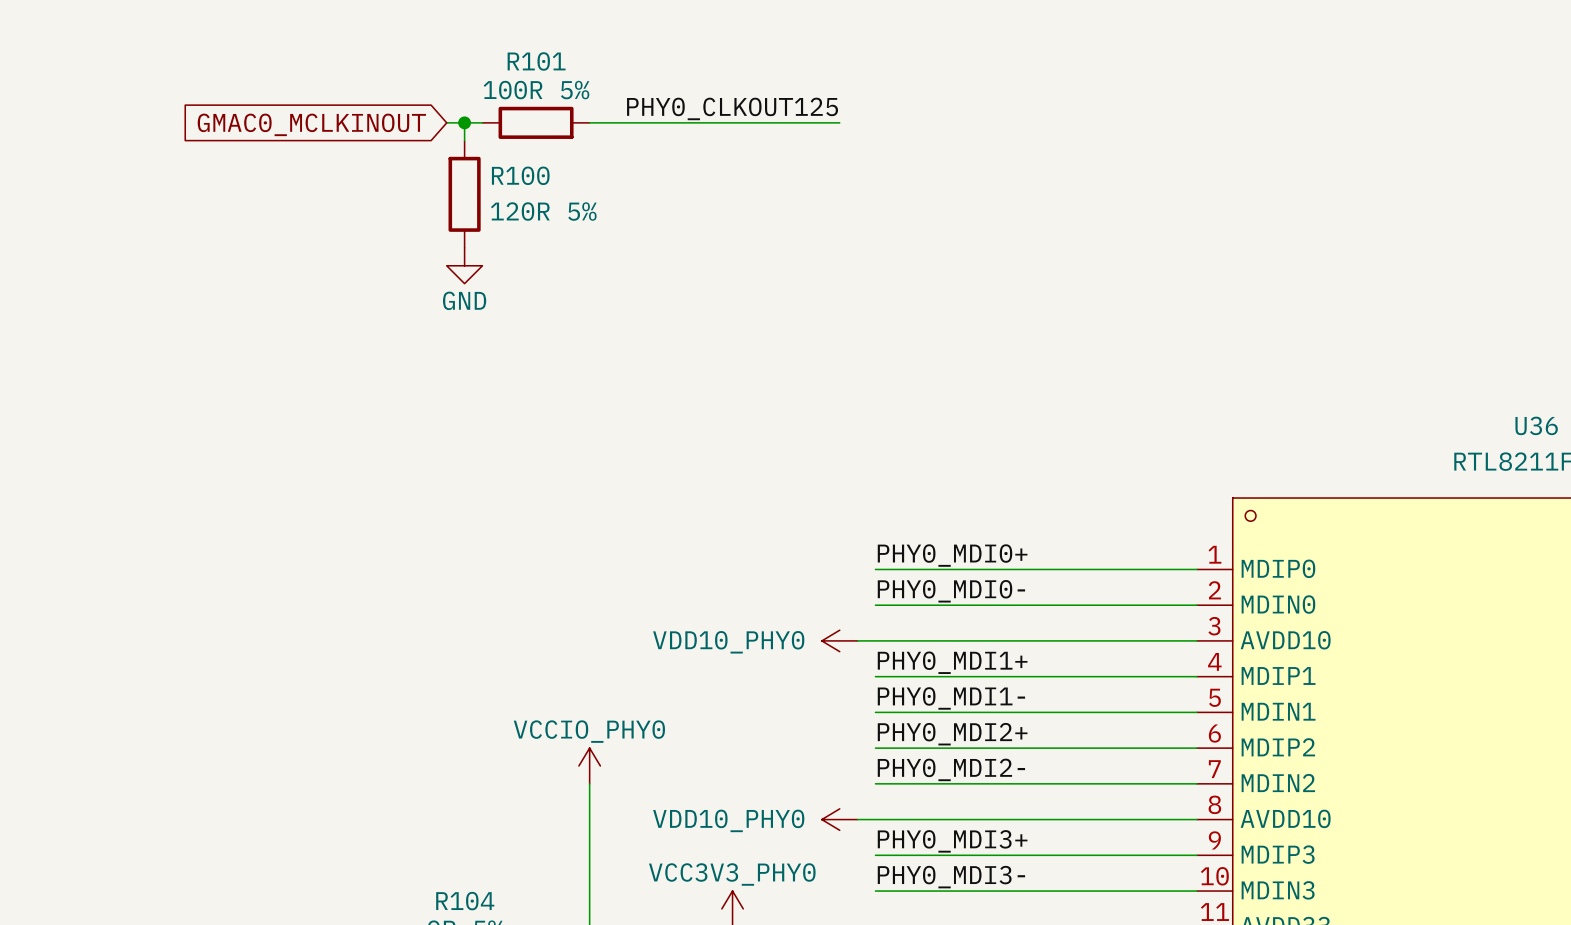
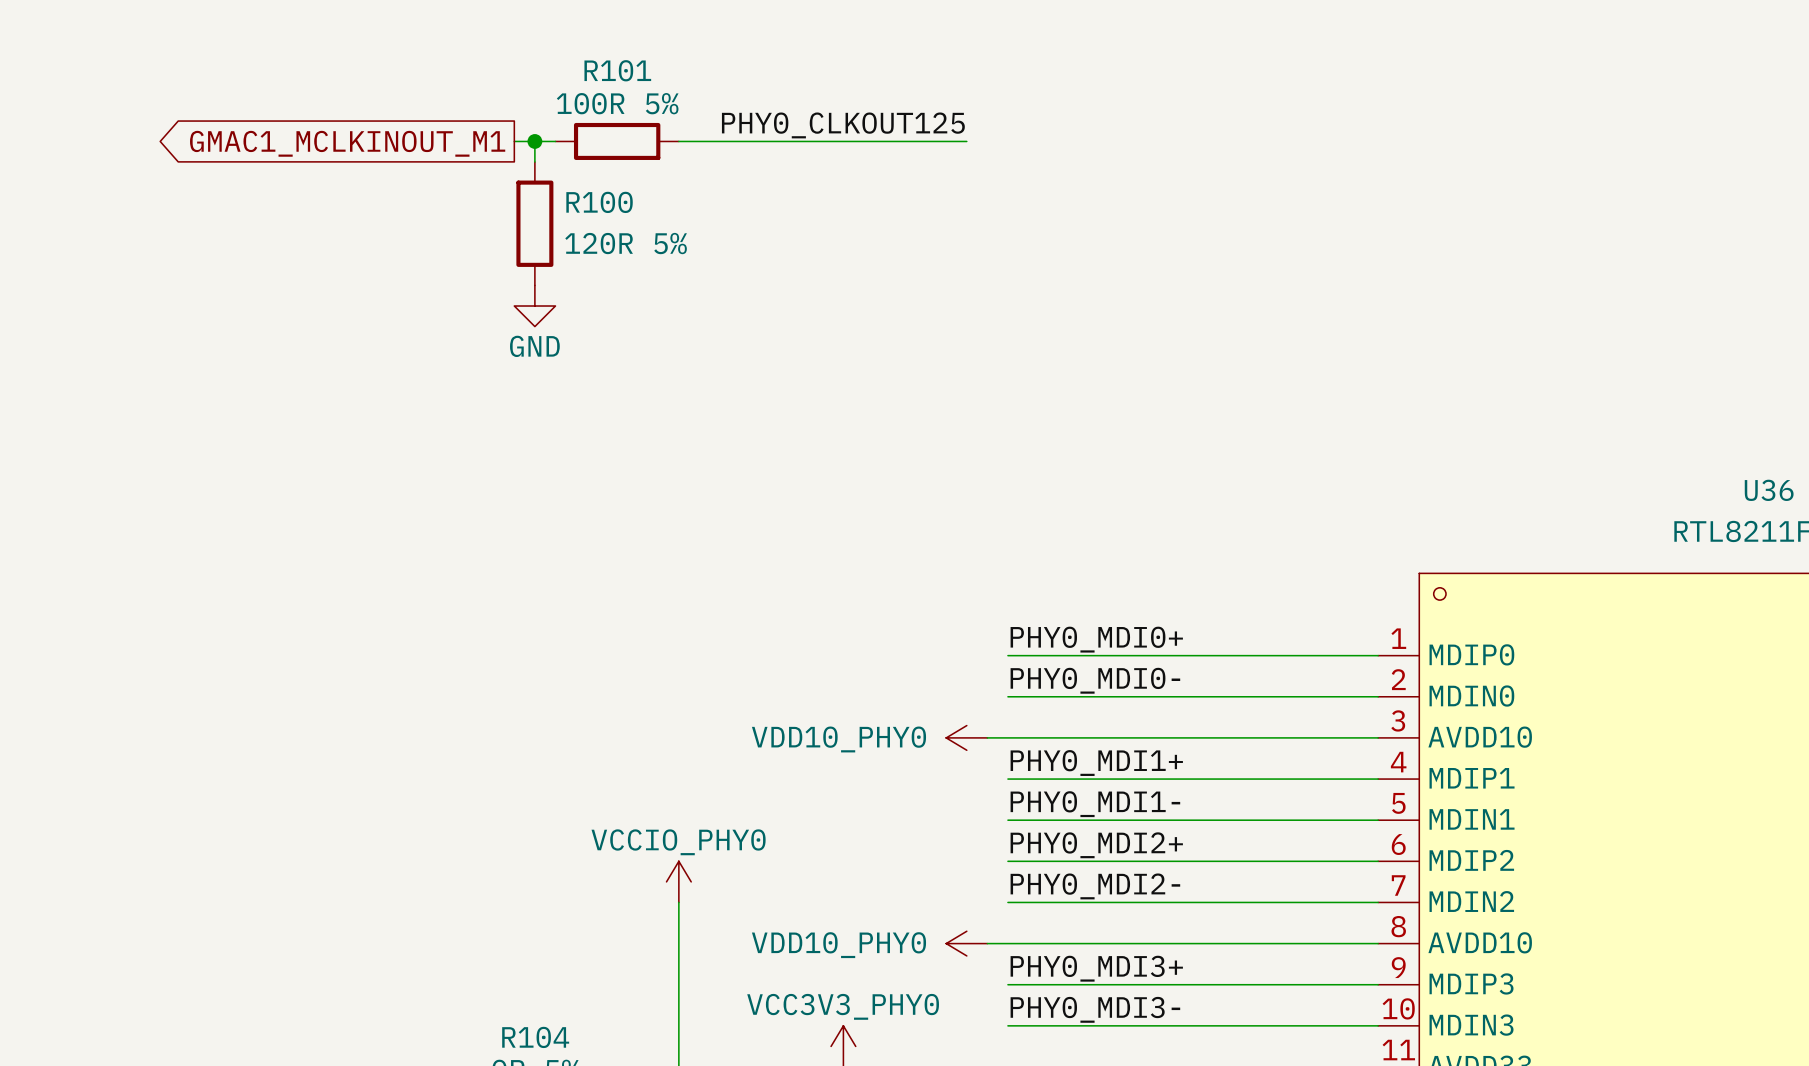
global label shape: input (311, 124) -> output (347, 143)
global label: GMAC0_MCLKINOUT (311, 124) -> GMAC1_MCLKINOUT_M1 (347, 143)

